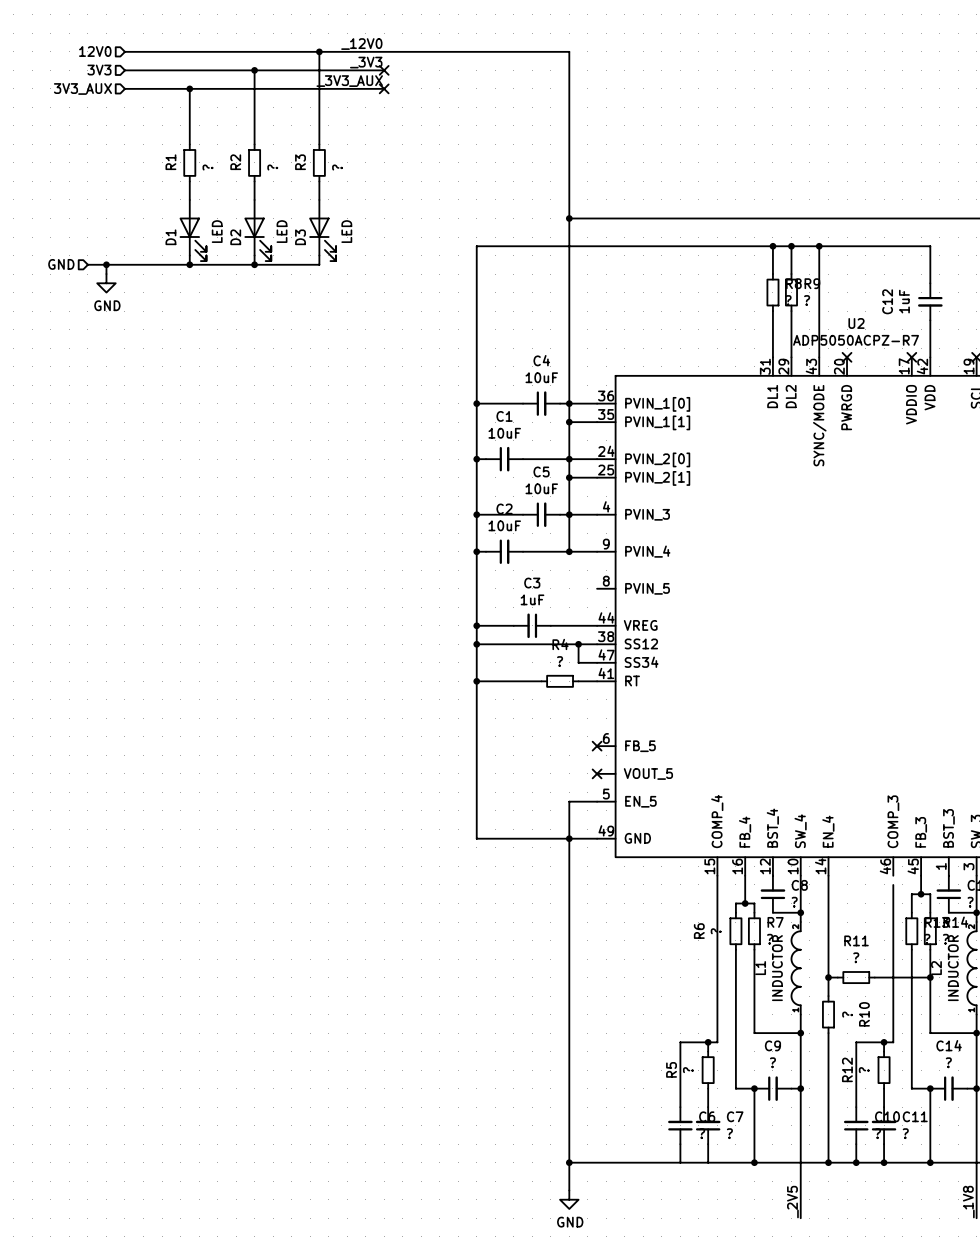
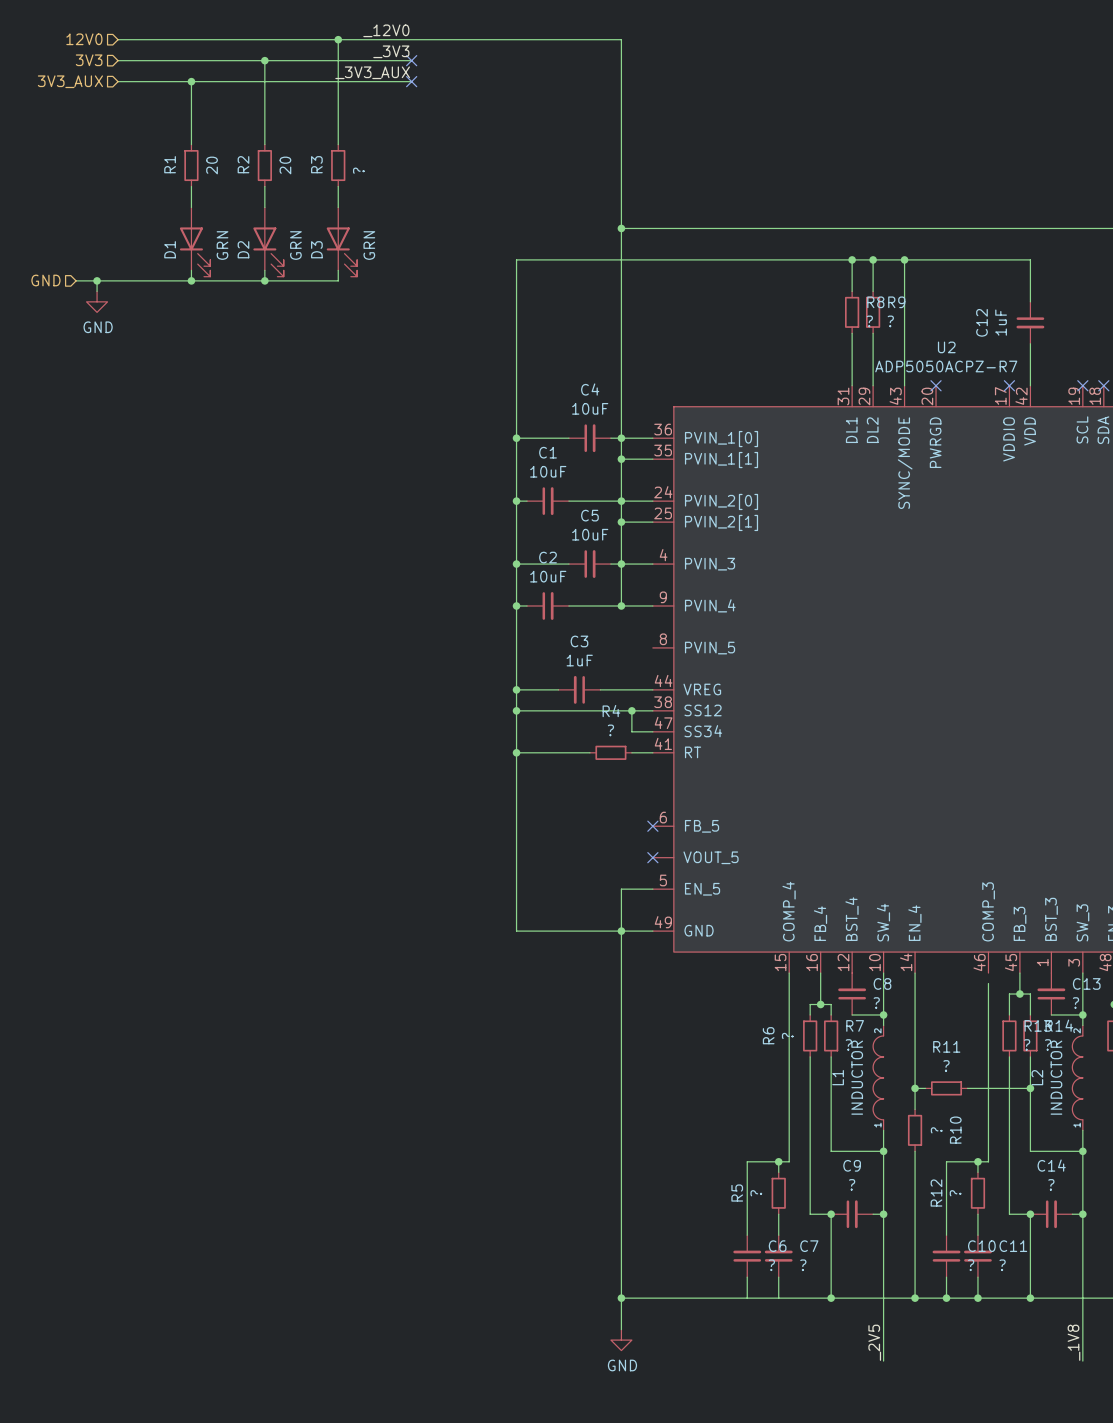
R1 value: ? (207, 167) -> 20 (212, 165)
R2 value: ? (272, 167) -> 20 (285, 165)
D1 value: LED (217, 231) -> GRN (222, 245)
D2 value: LED (282, 231) -> GRN (295, 245)
D3 value: LED (346, 231) -> GRN (369, 245)

